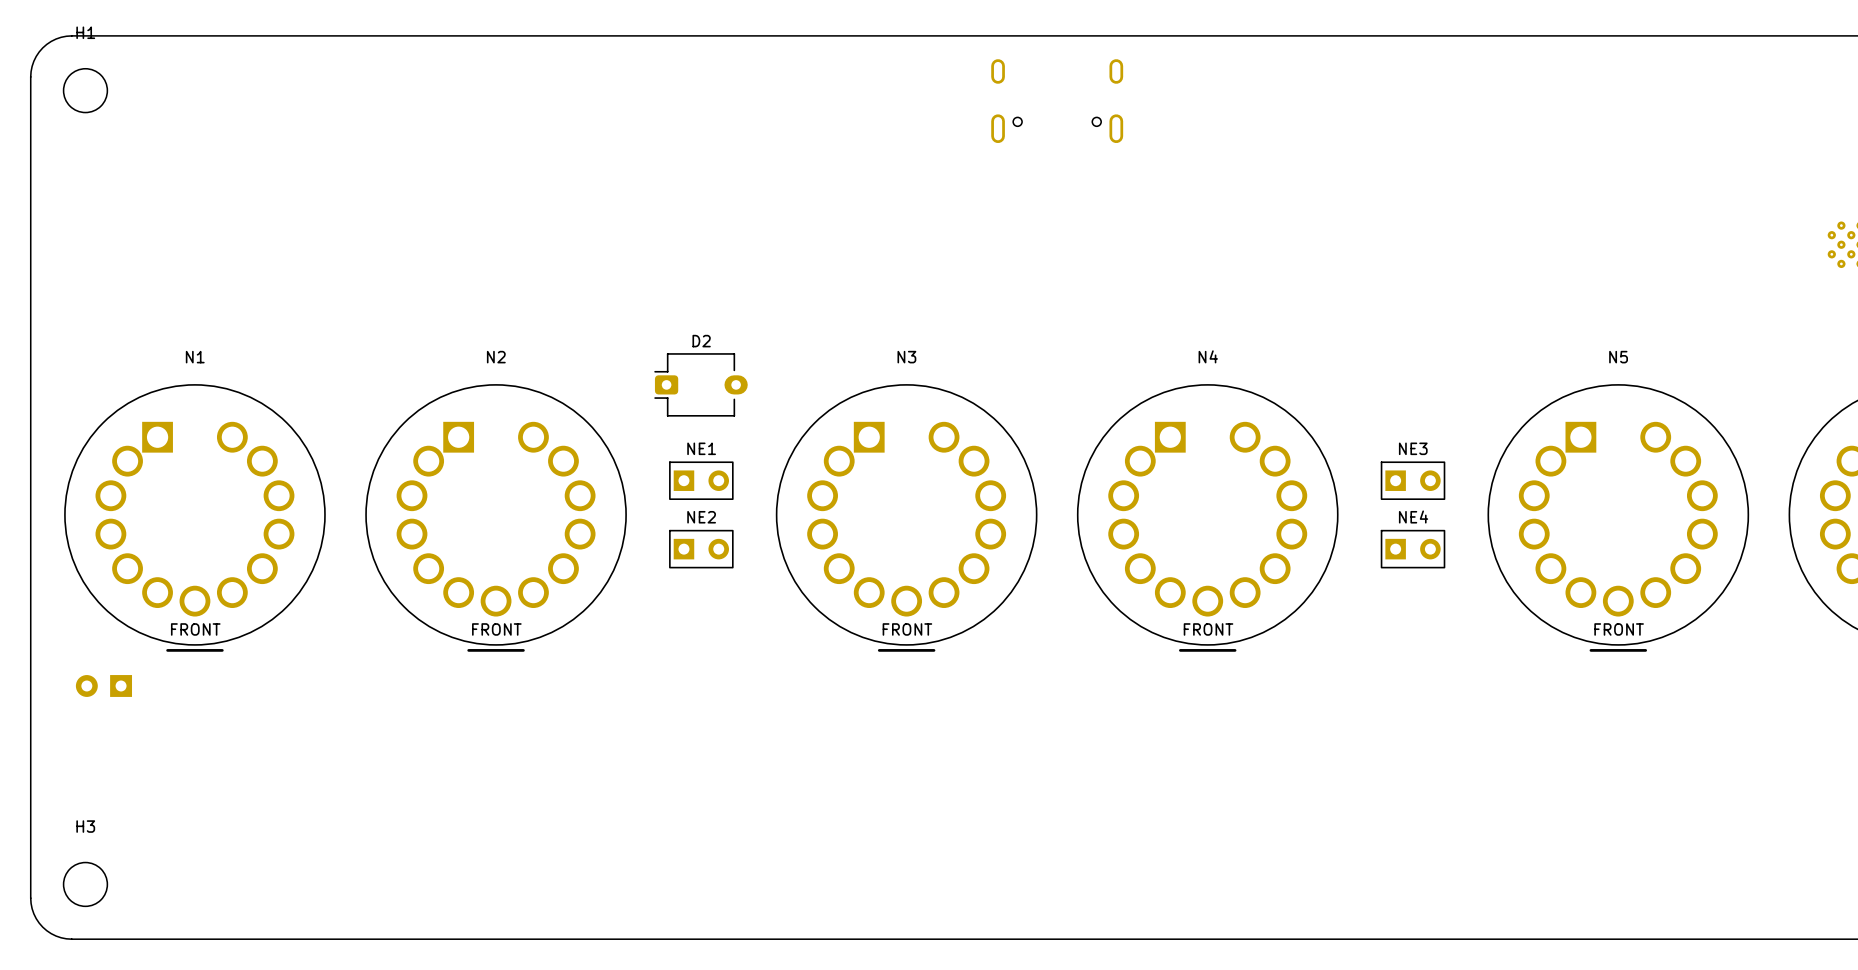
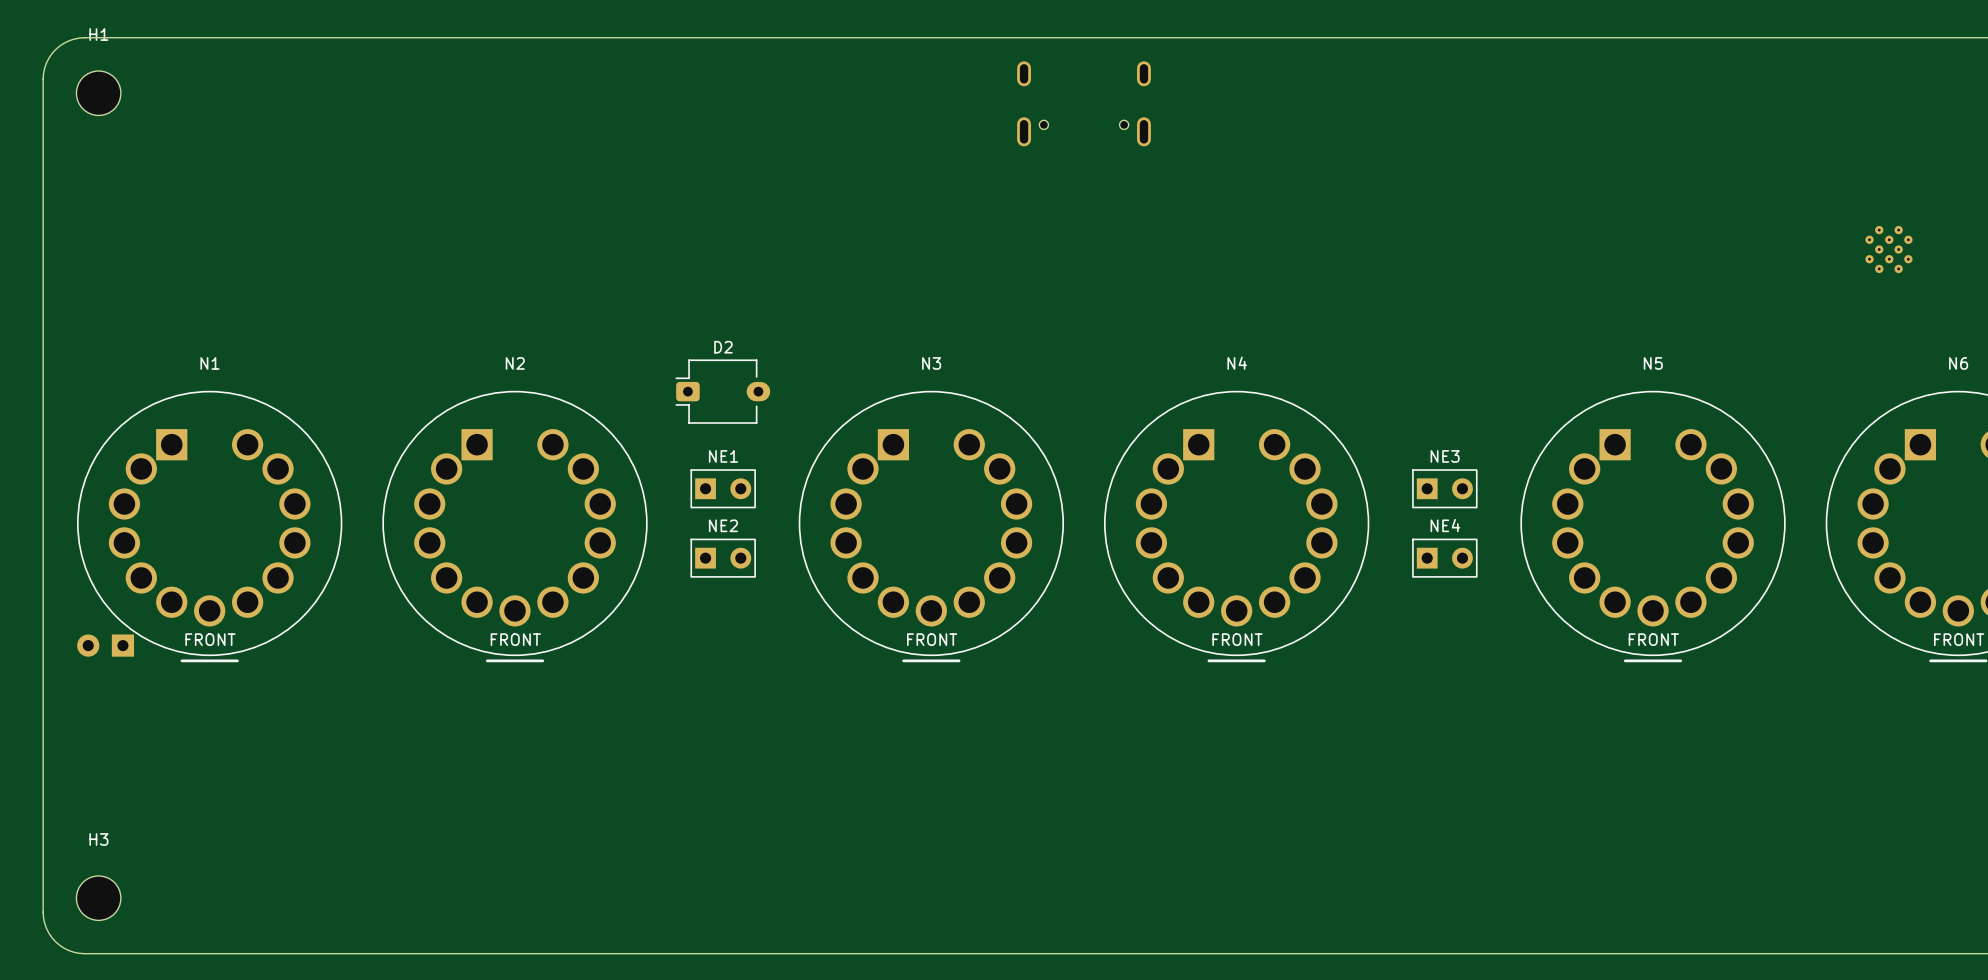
part position: (103, 685) -> (105, 645)

